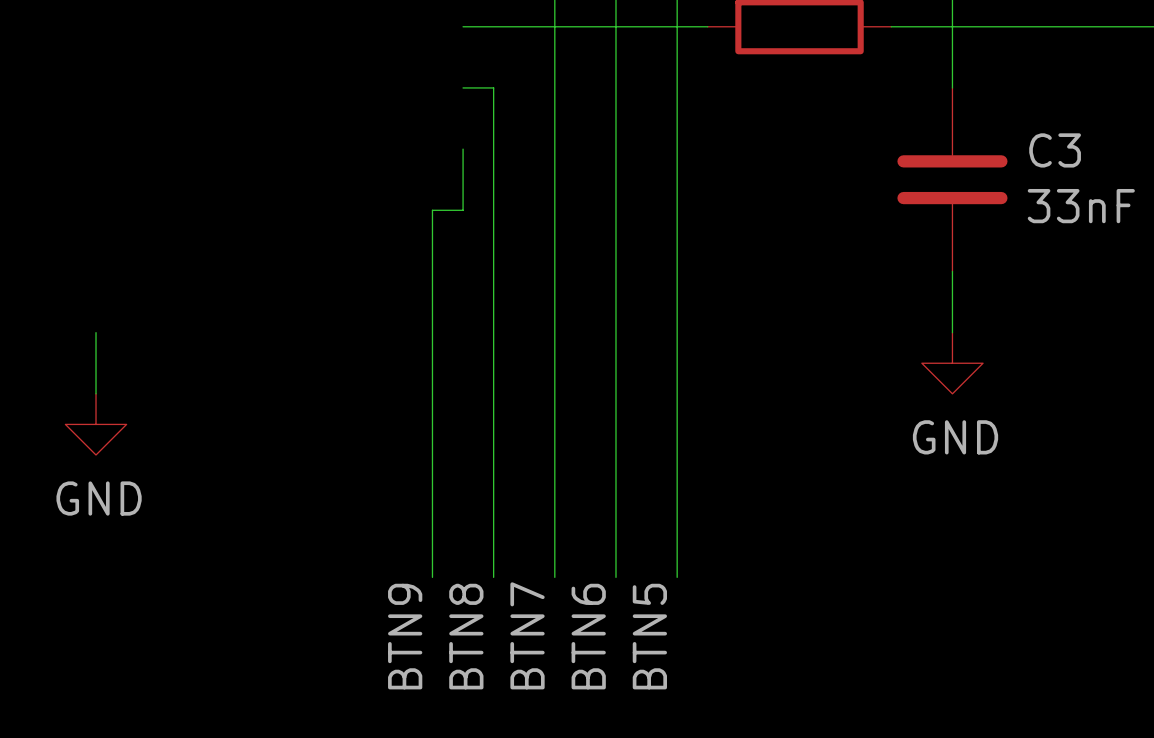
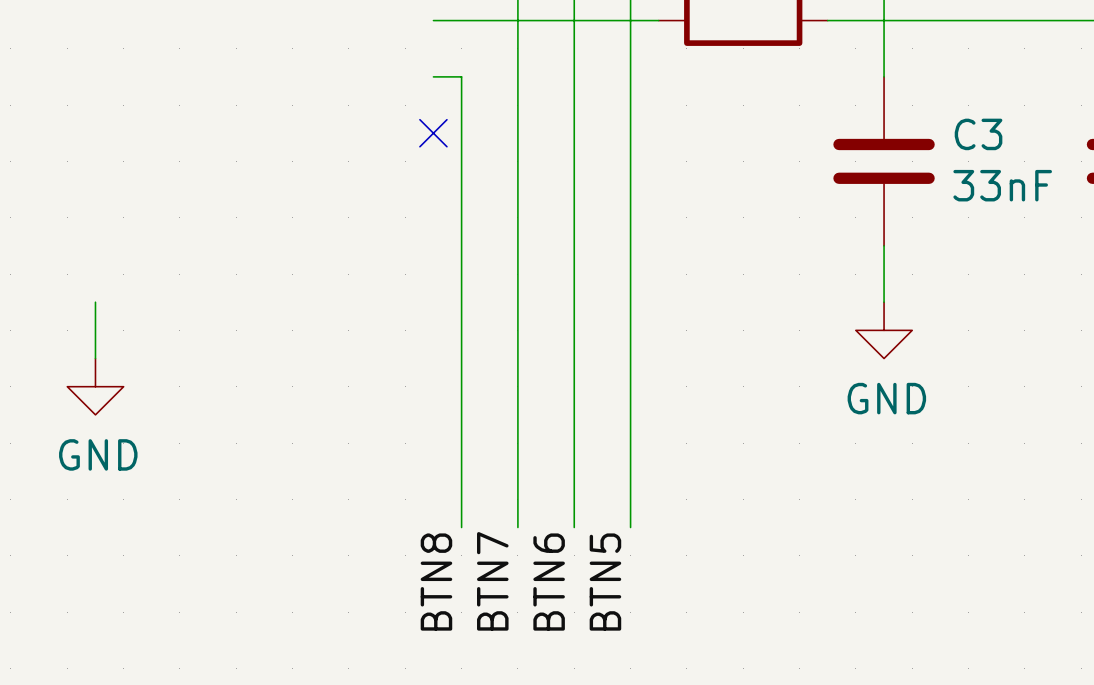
wire: (463, 149) (463, 210) (432, 210) (432, 577) -> none
no-connect mark: none -> (433, 133)
label: BTN9 (405, 636) -> none

